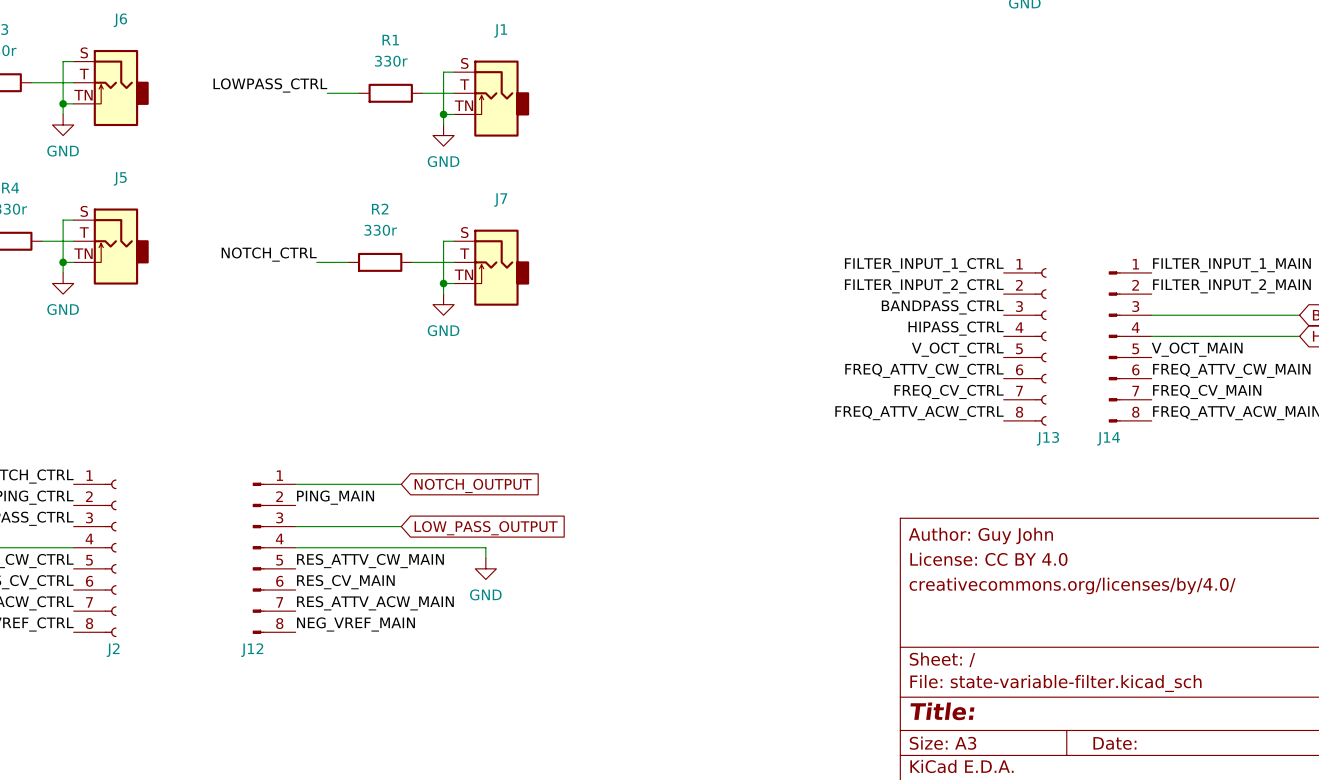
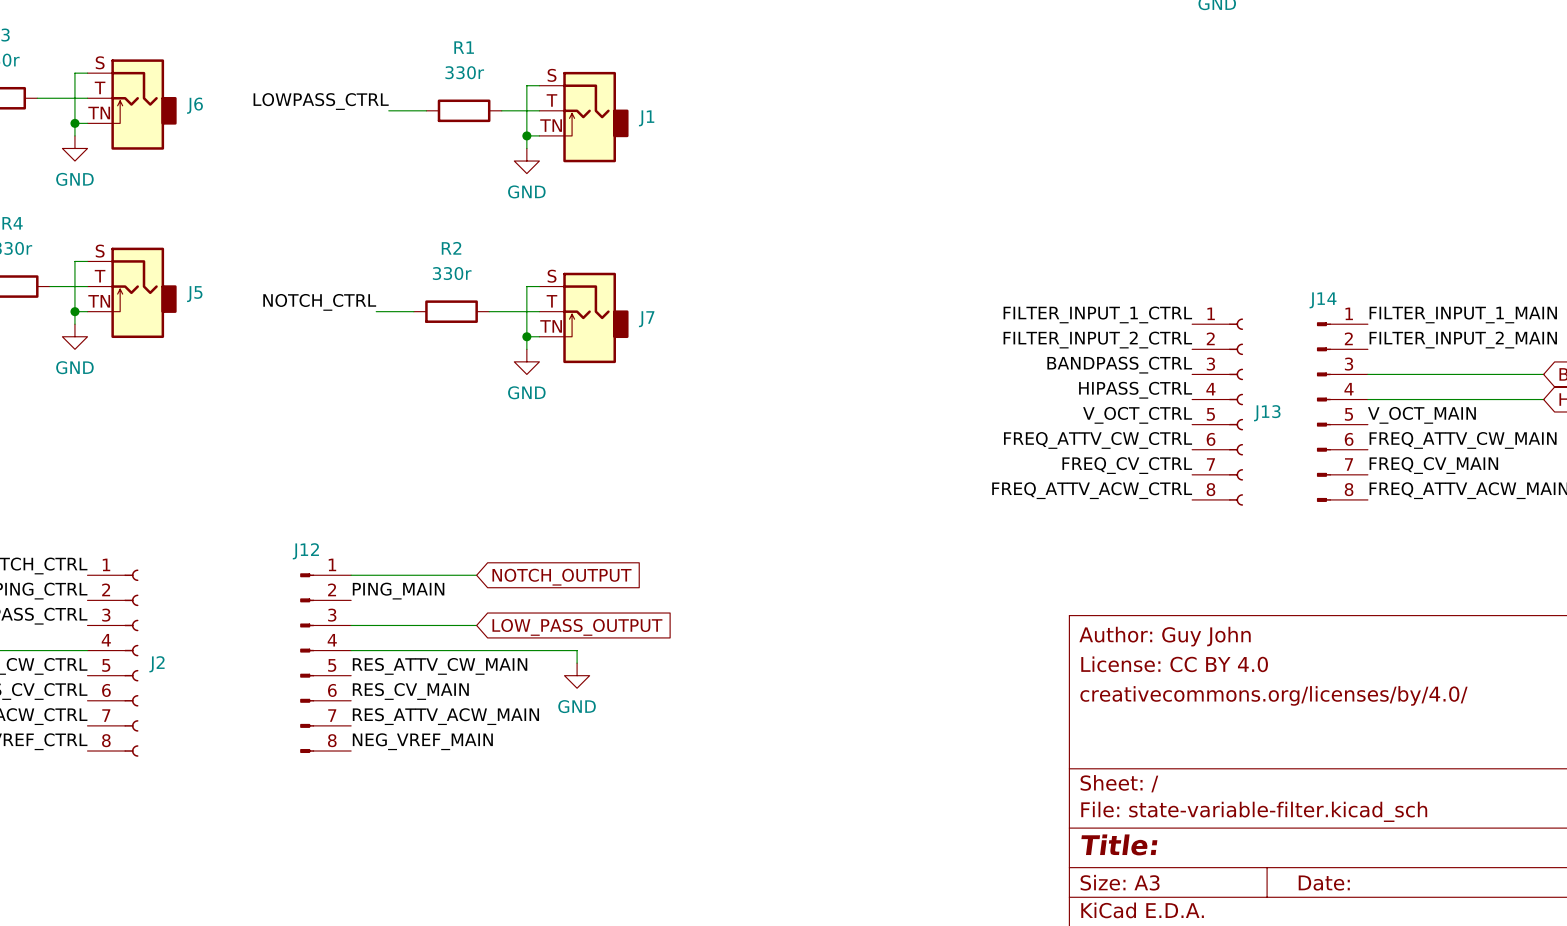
J6 name position: J6 (120, 20) -> J6 (194, 105)
J1 name position: J1 (500, 30) -> J1 (646, 118)
J5 name position: J5 (120, 178) -> J5 (194, 294)
J7 name position: J7 (500, 200) -> J7 (646, 319)
J13 name position: J13 (1047, 438) -> J13 (1267, 413)
J14 name position: J14 (1108, 438) -> J14 (1323, 300)
J2 name position: J2 (113, 650) -> J2 (156, 664)
J12 name position: J12 (252, 650) -> J12 (305, 551)

